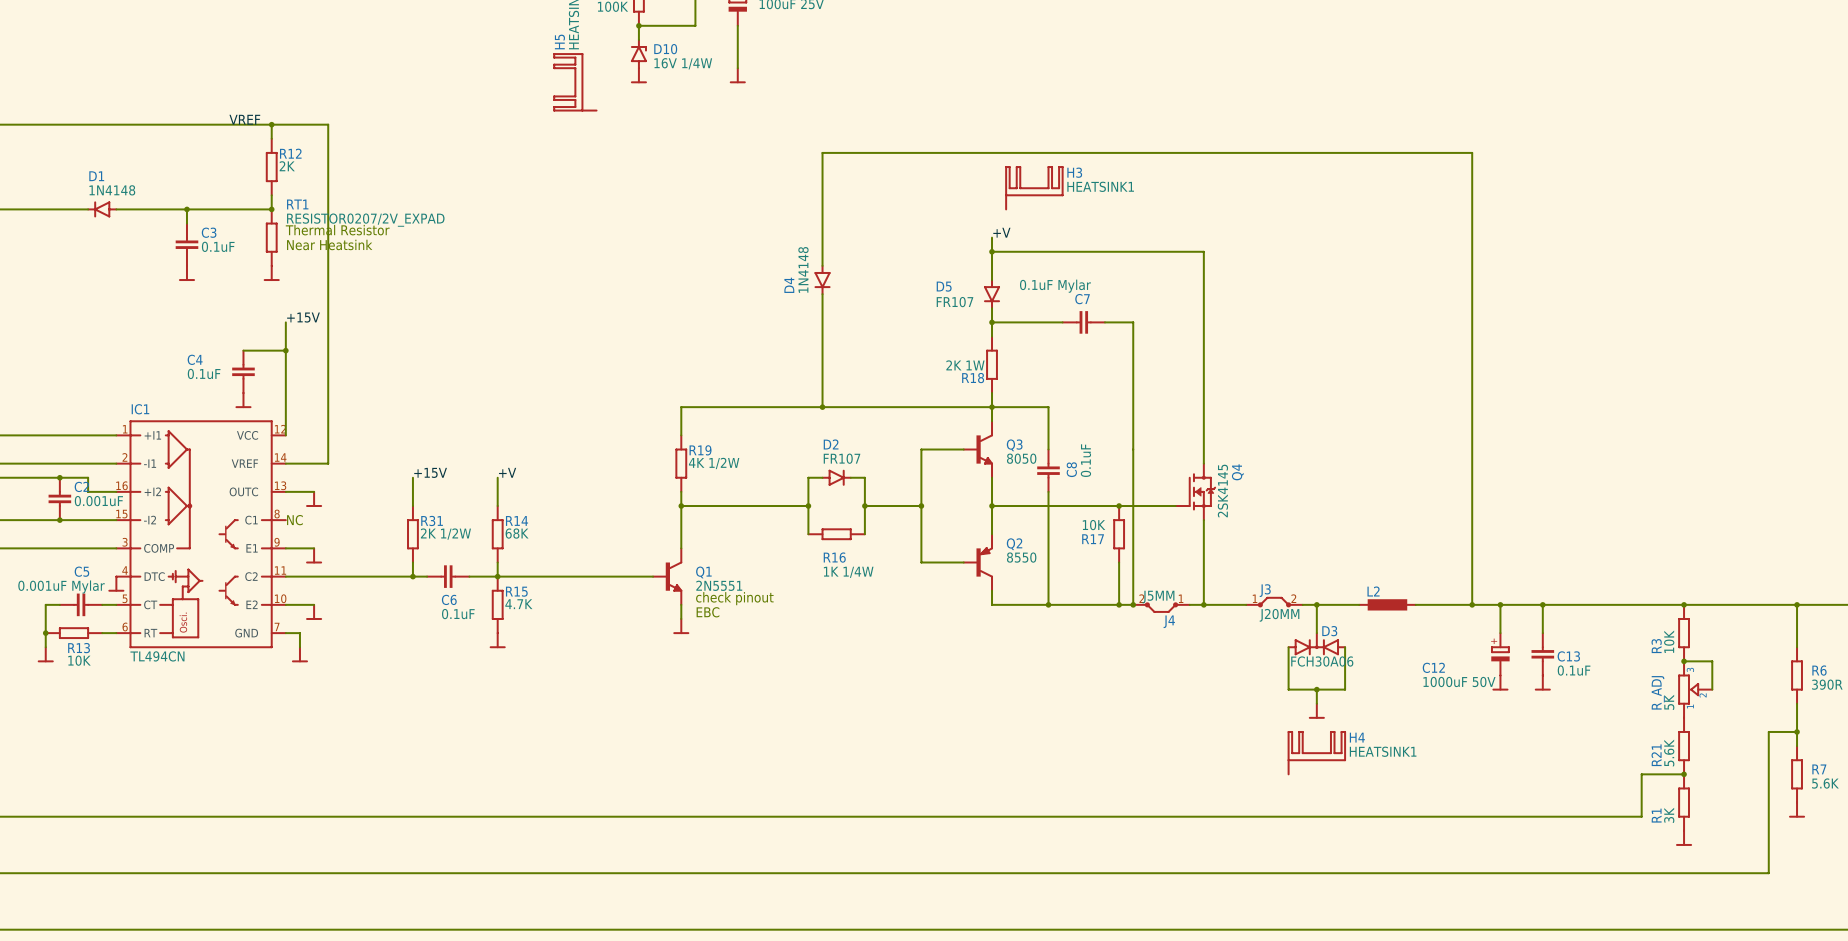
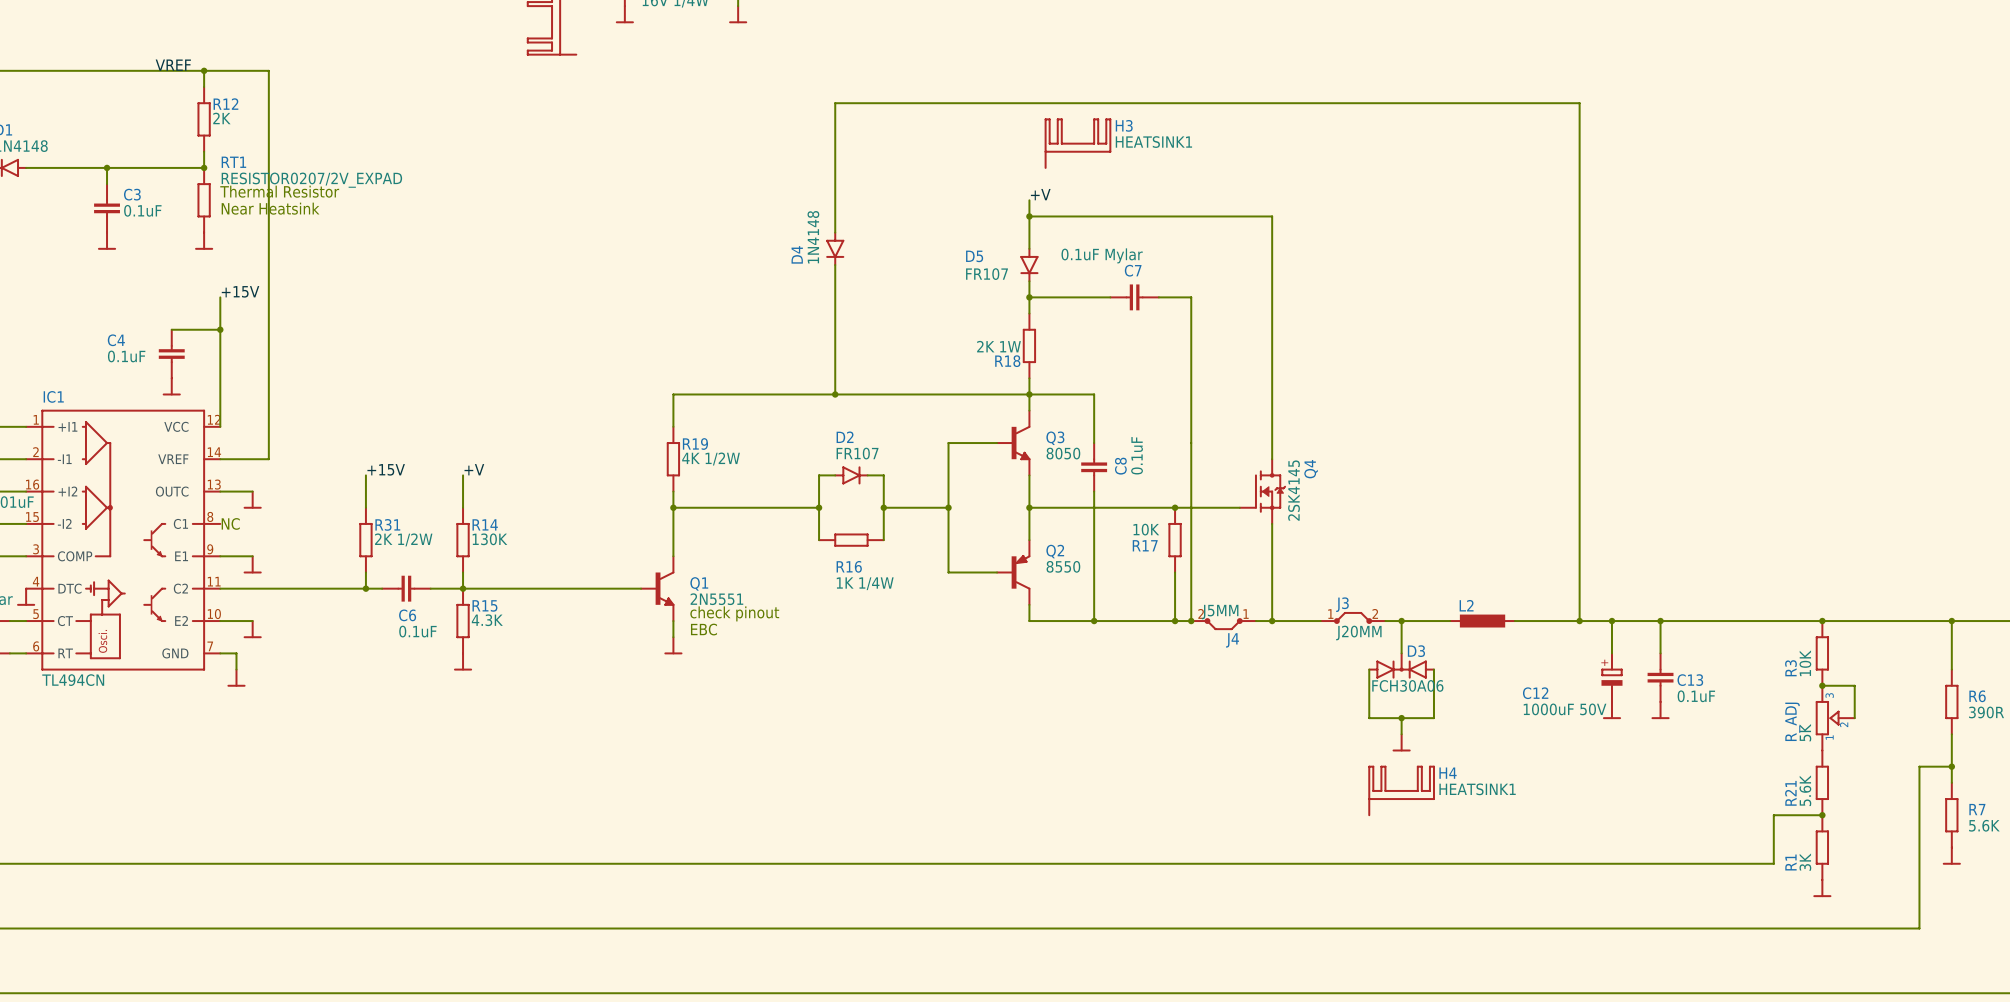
R14 value: 68K (517, 533) -> 130K (489, 539)
R15 value: 4.7K (518, 604) -> 4.3K (487, 620)

